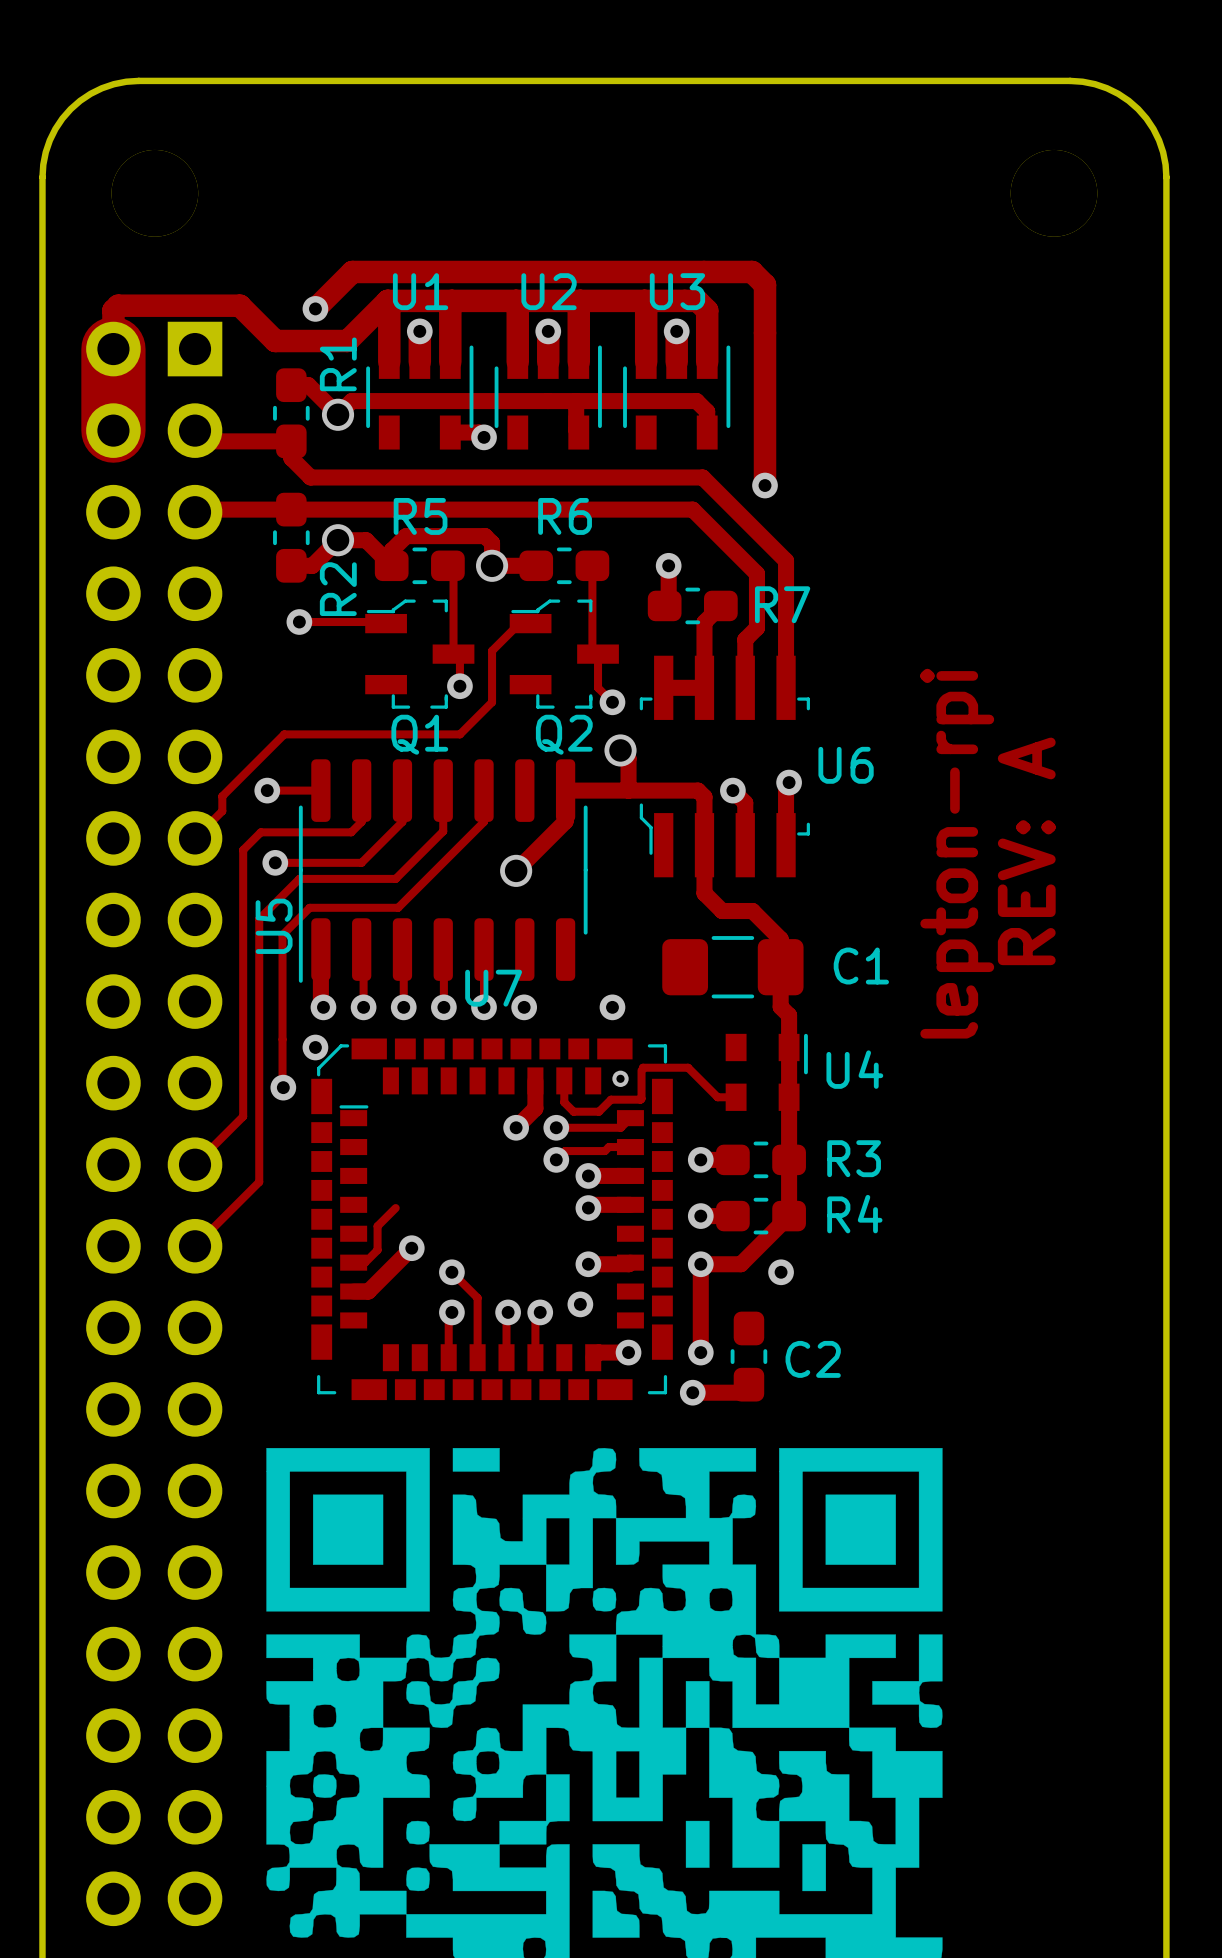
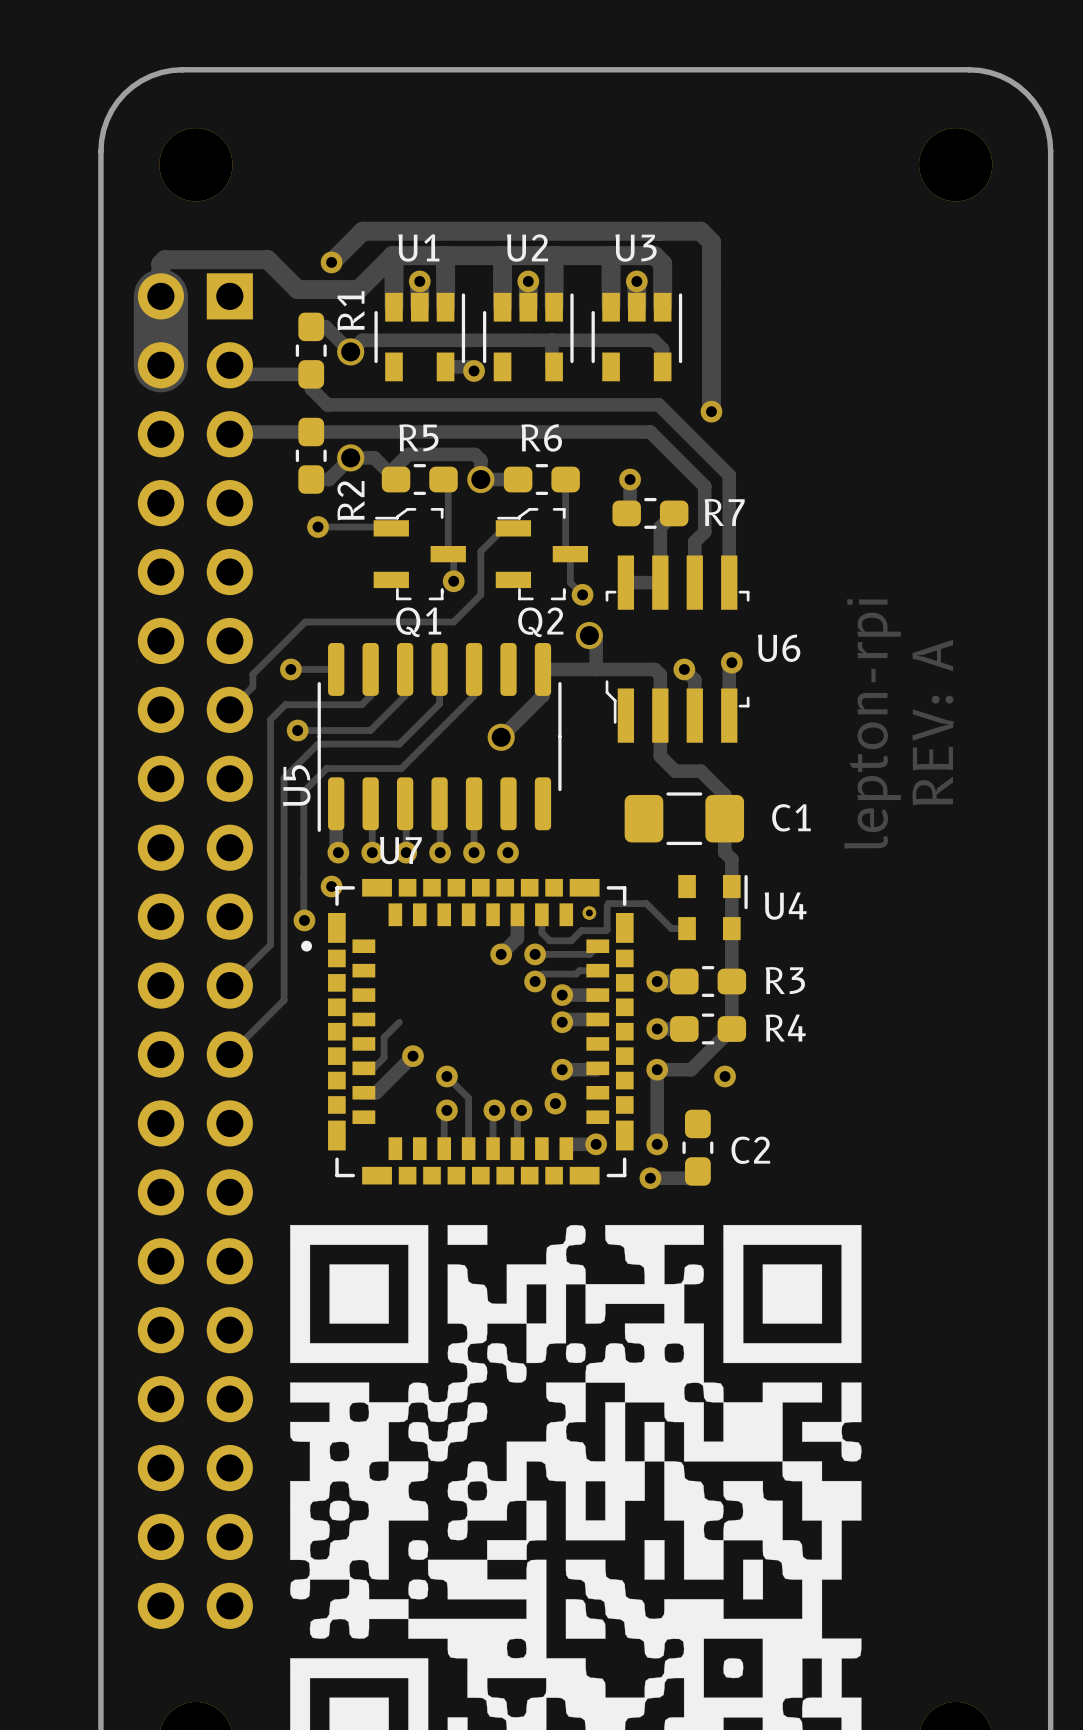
U7 name position: U7 (493, 988) -> U7 (400, 850)
via: (612, 1007) -> none
U7 footprint: [311, 1038, 673, 1401] -> [301, 878, 634, 1185]

